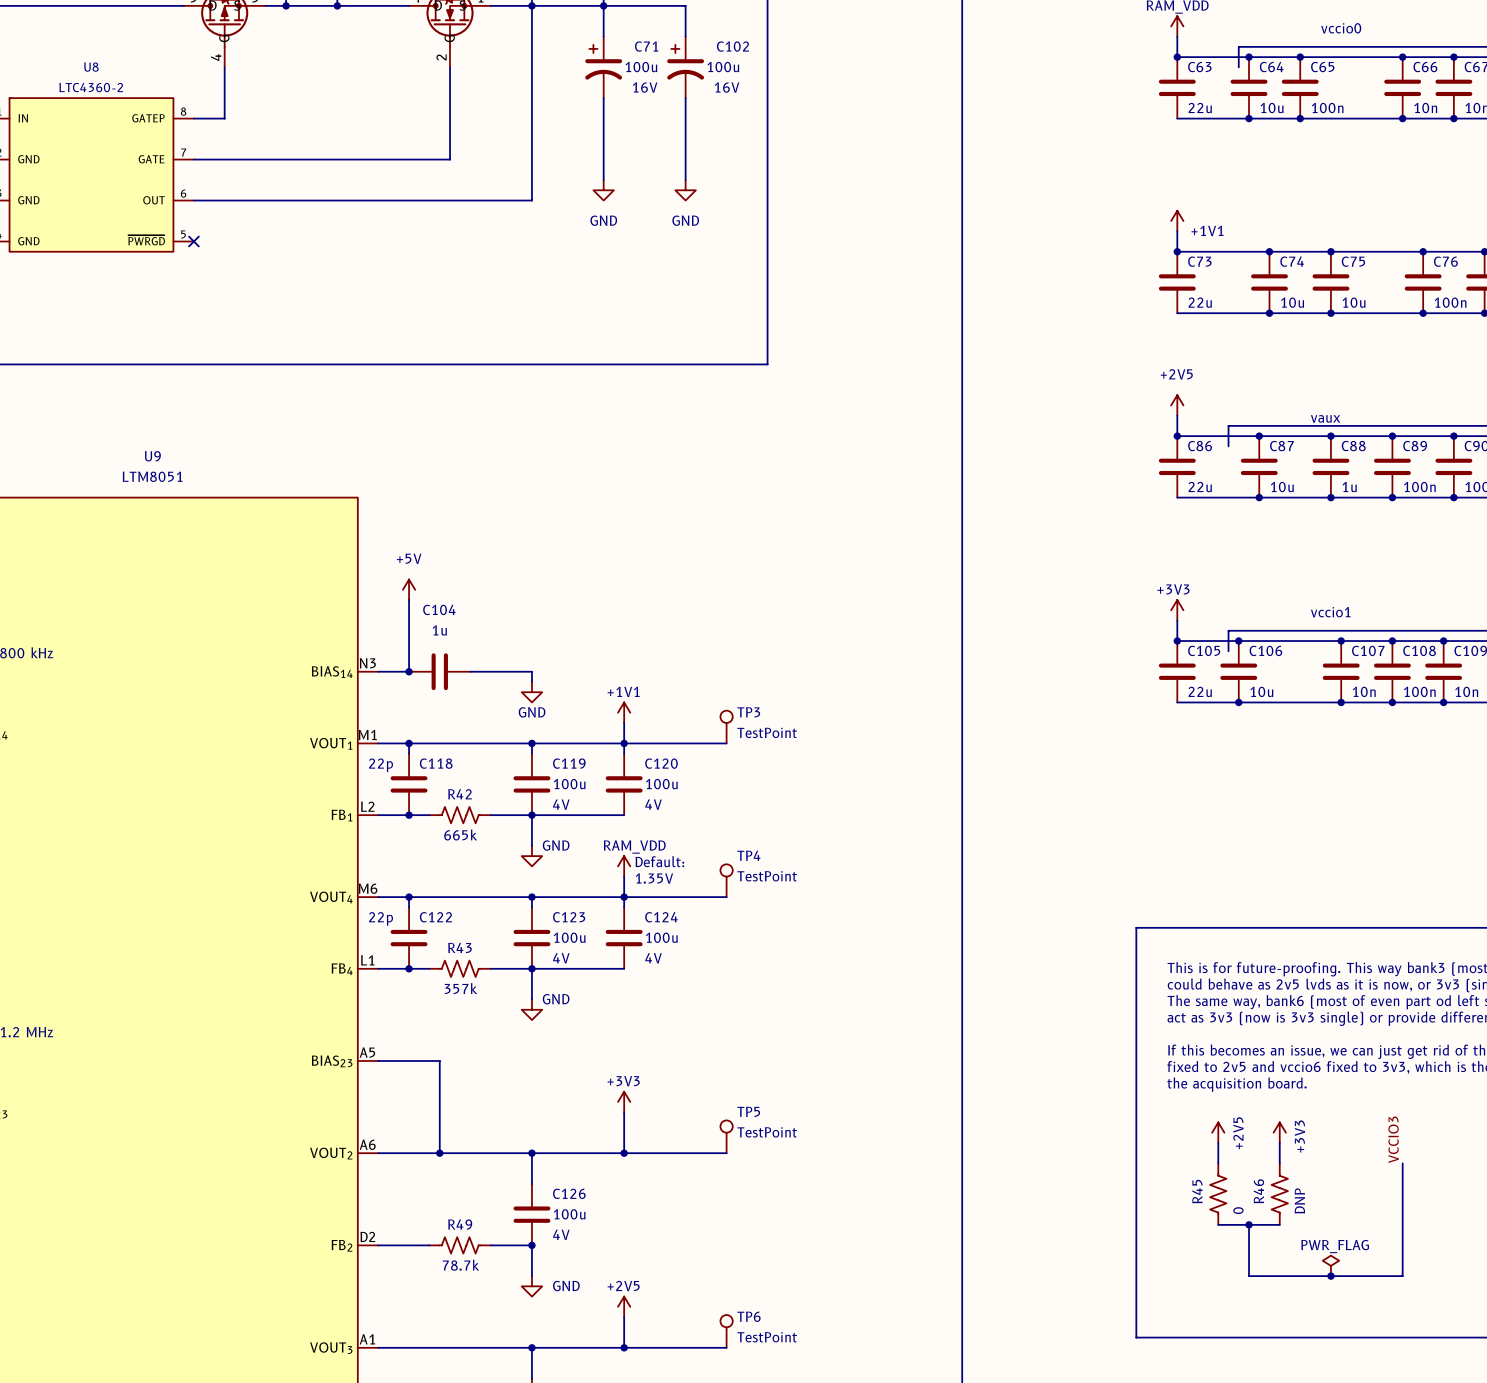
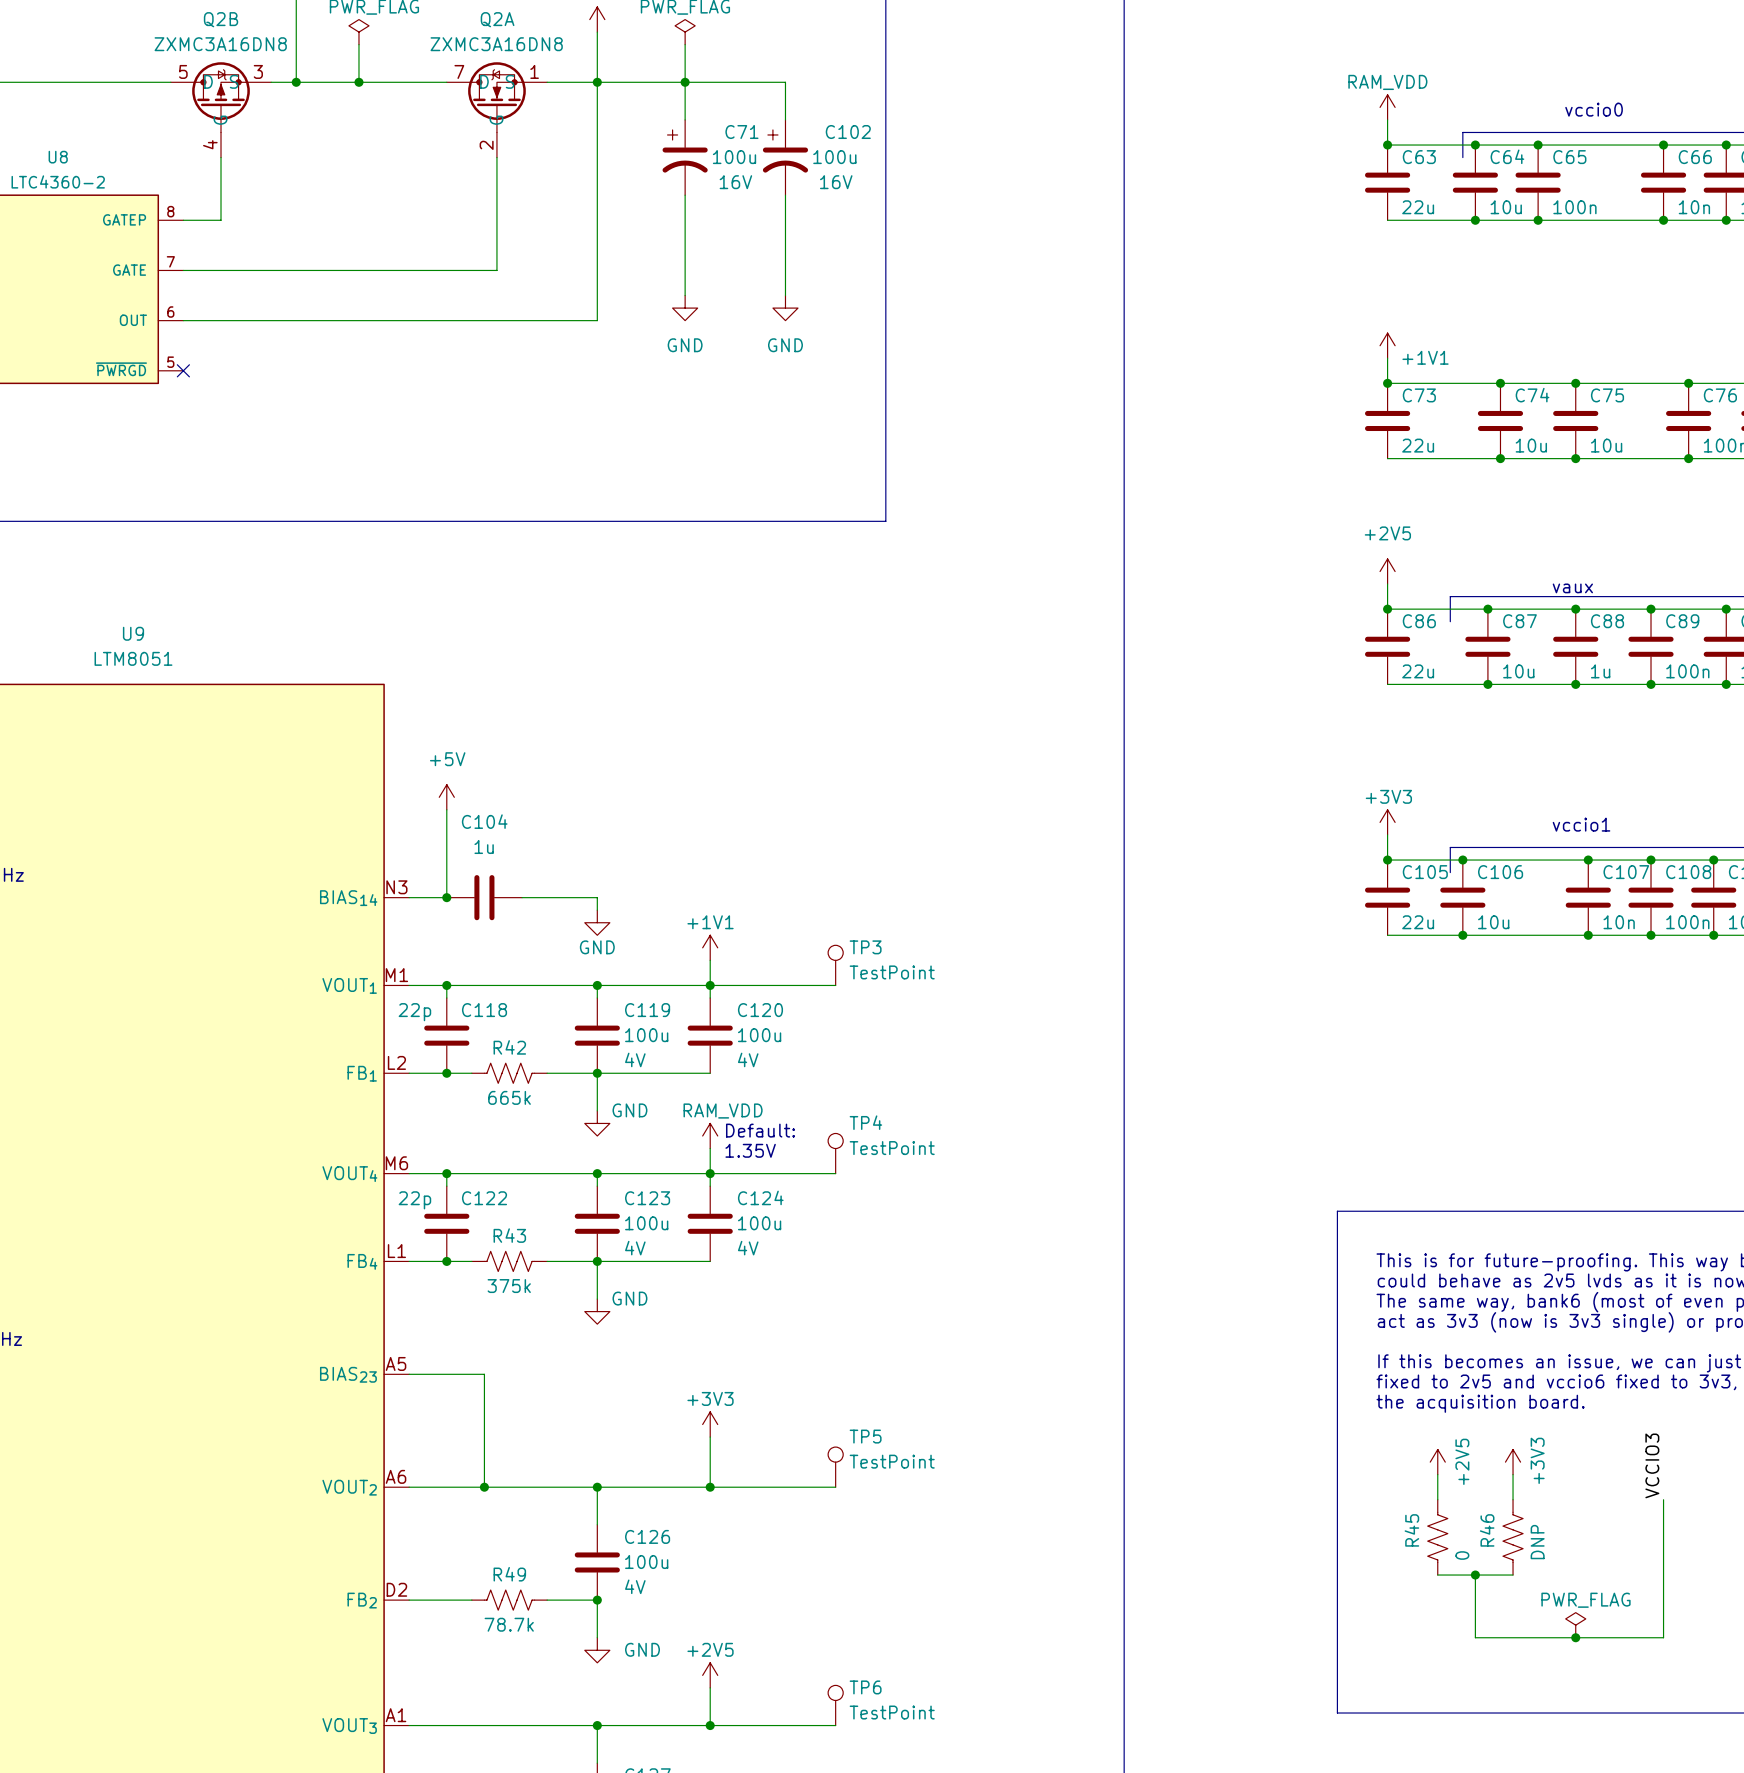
R43 value: 357k (460, 988) -> 375k (509, 1286)

